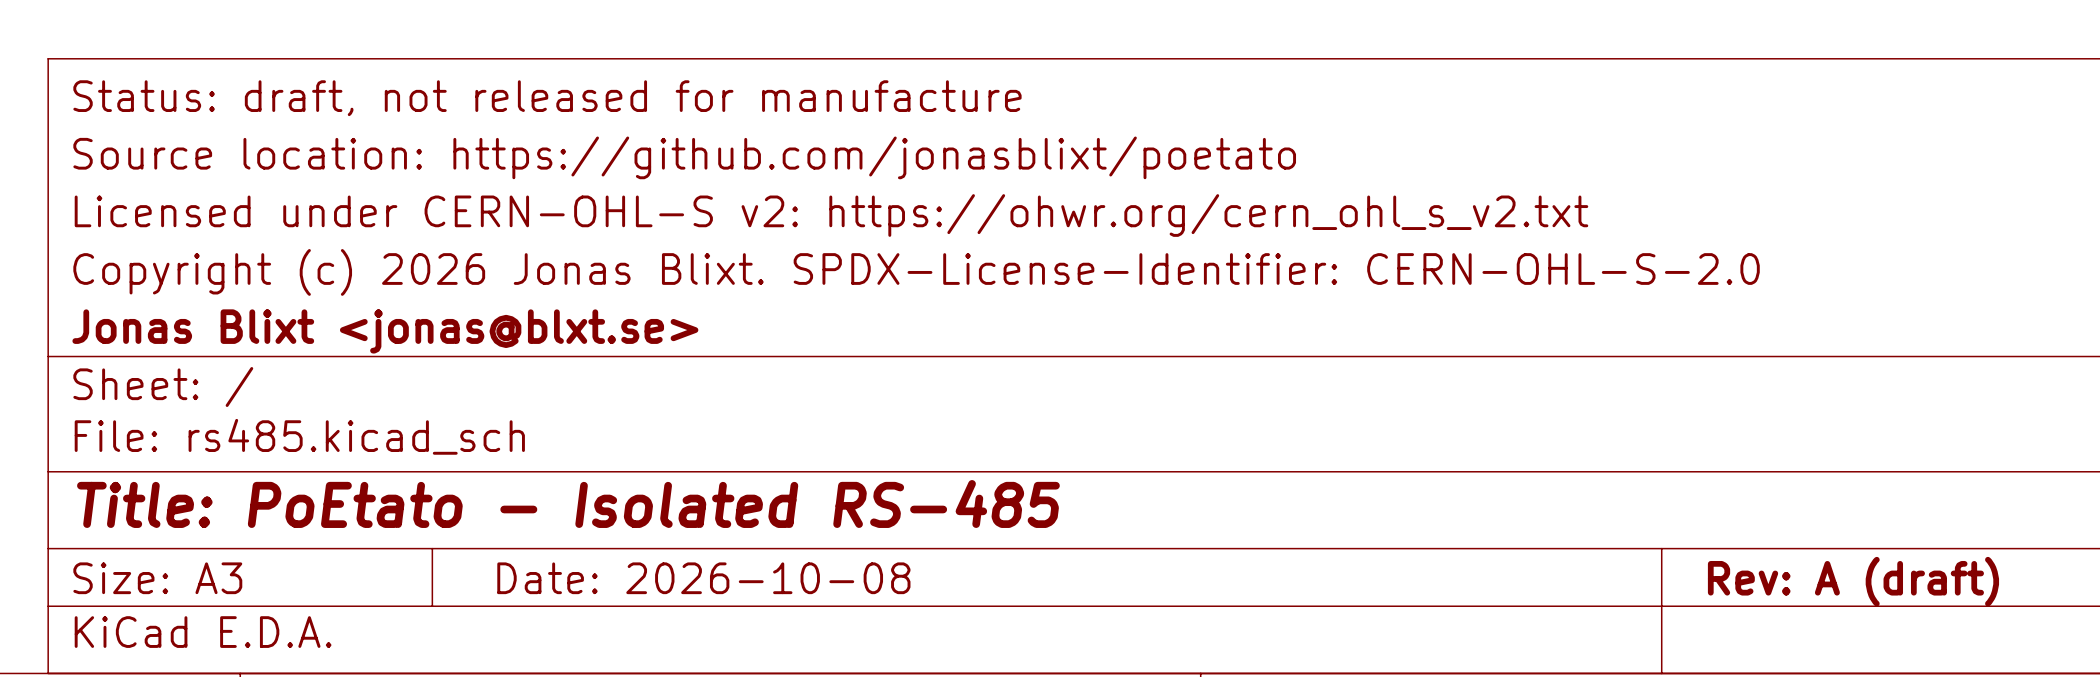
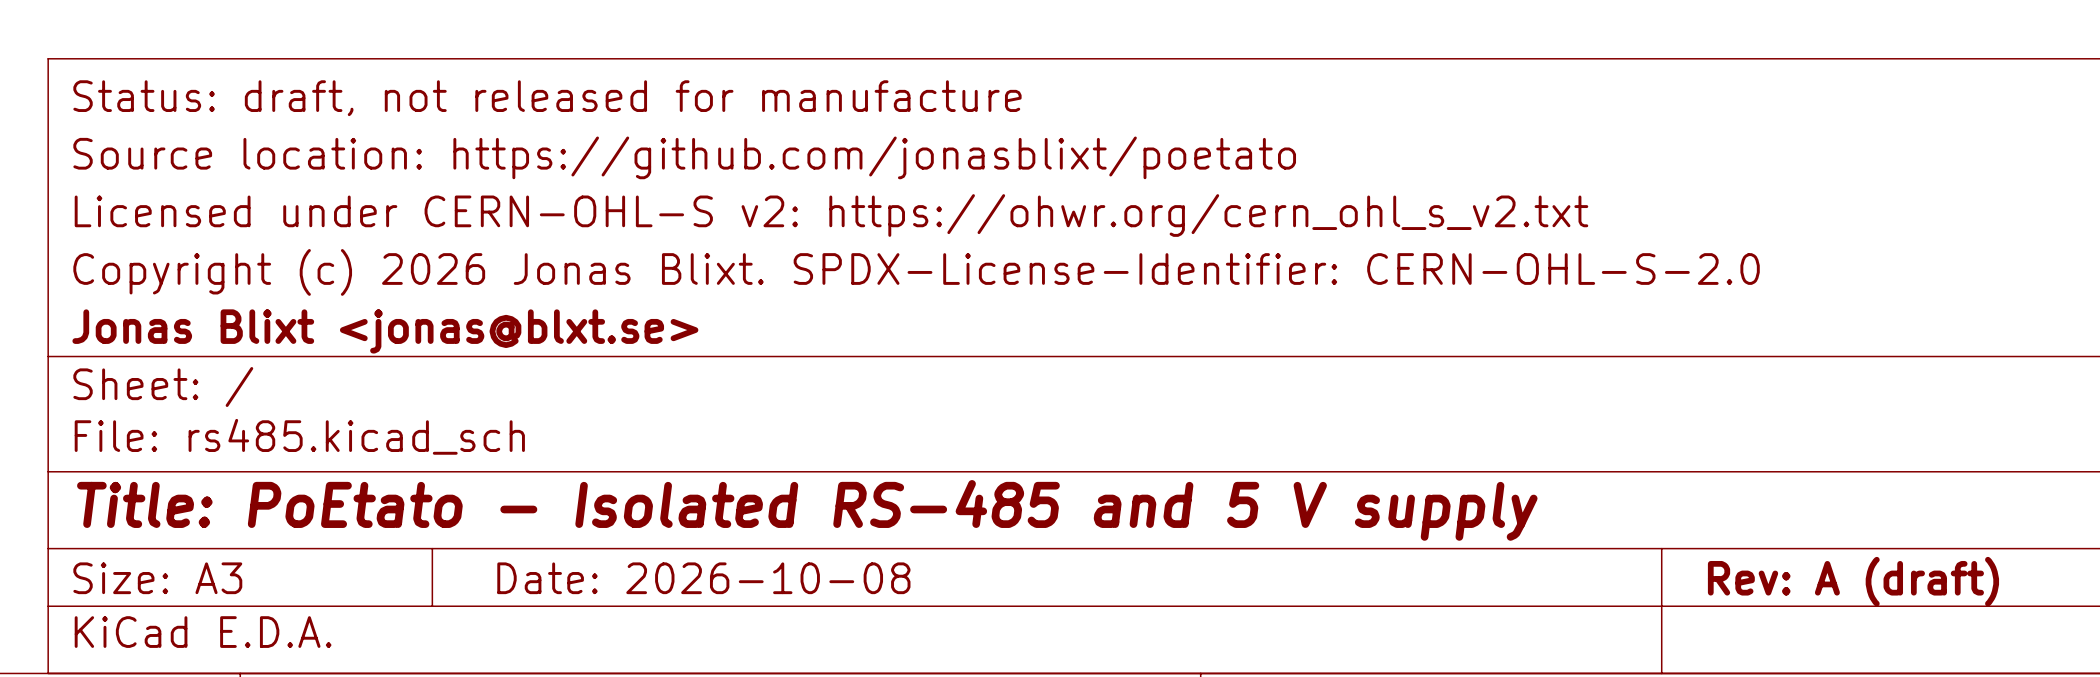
title block: Title: PoEtato - Isolated RS-485 (568, 504) -> Title: PoEtato - Isolated RS-485 and 5 V supply (807, 510)

